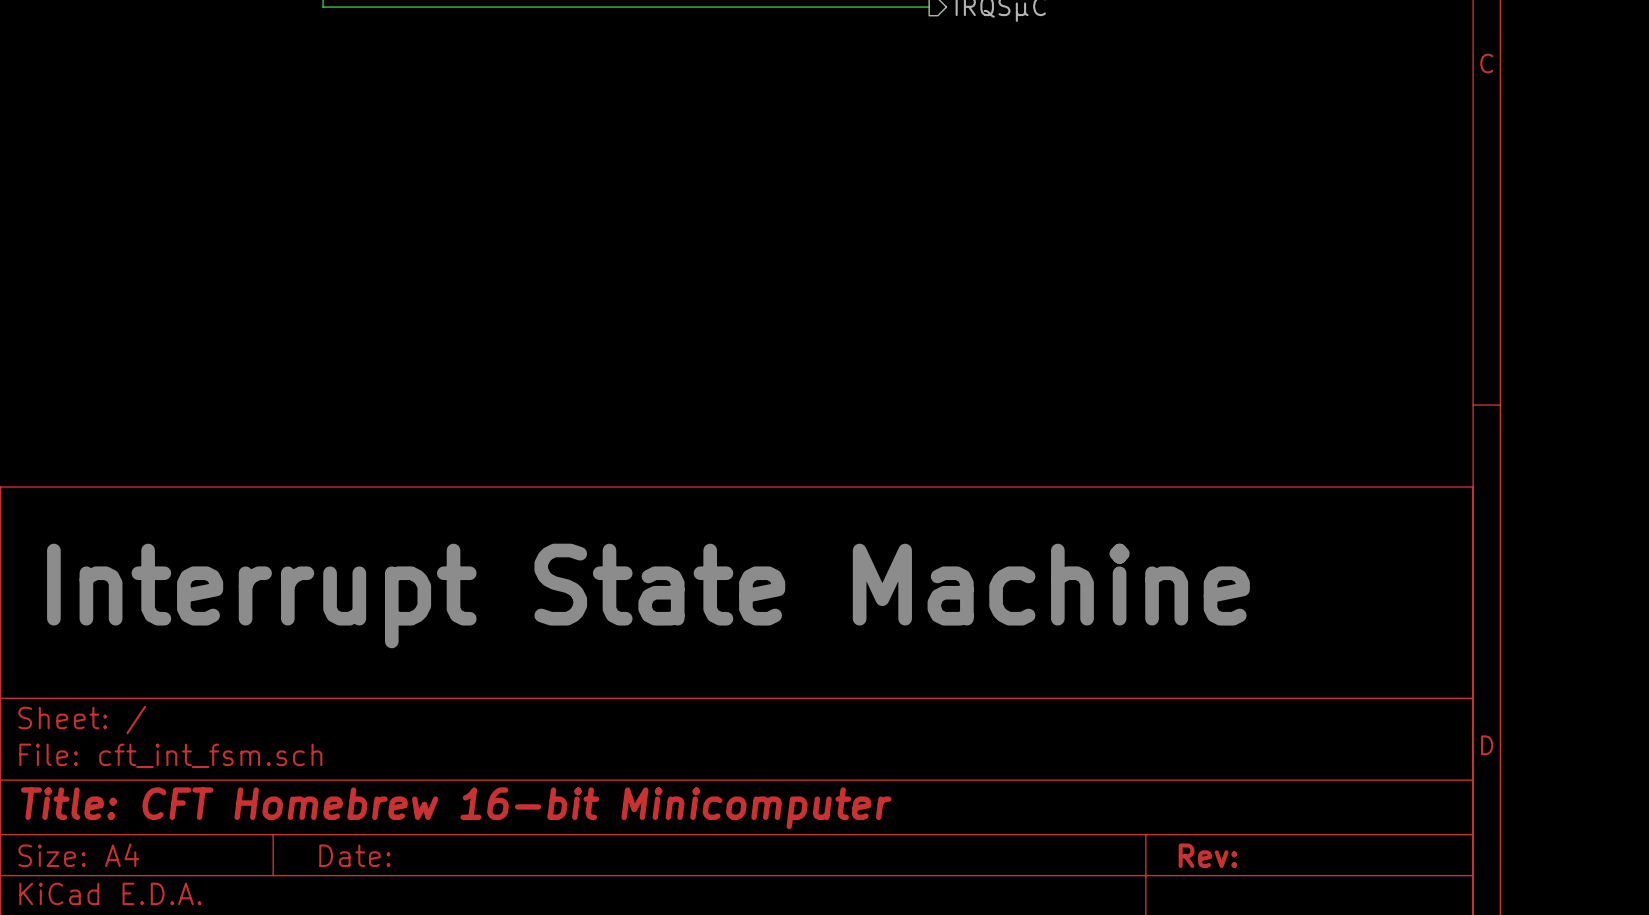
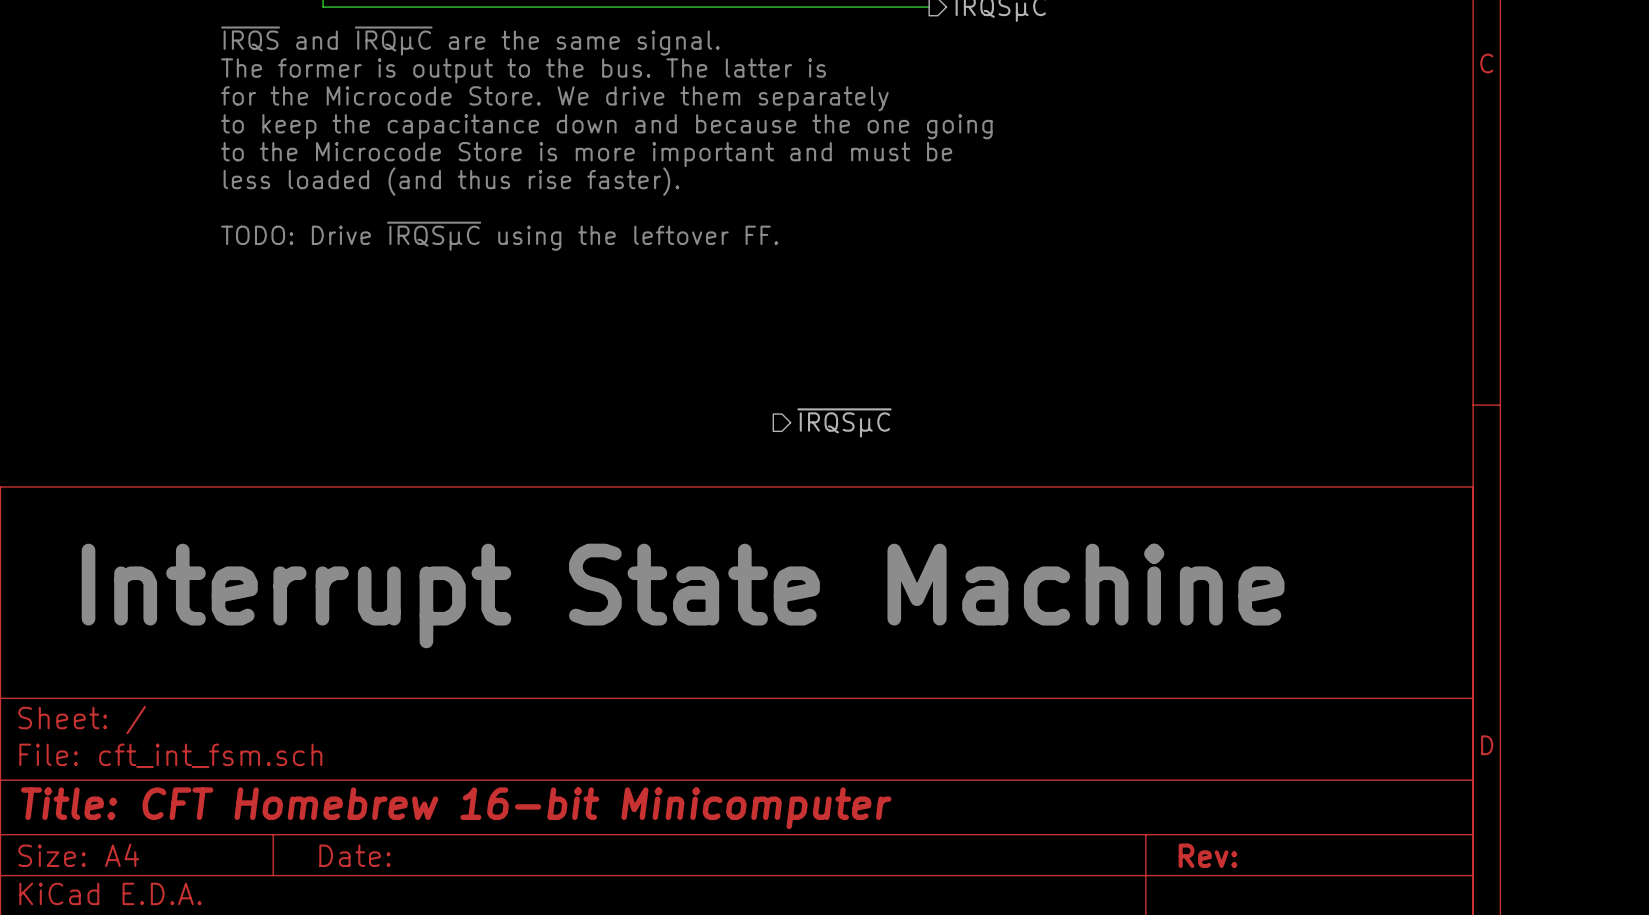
text: none -> ~{IRQS} and ~{IRQµC} are the same signal. (470, 41)
text: none -> The former is output to the bus. The latter is (523, 70)
text: none -> for the Microcode Store. We drive them separately (554, 98)
text: none -> to keep the capacitance down and because the one going (606, 126)
text: none -> to the Microcode Store is more important and must be (586, 154)
text: none -> less loaded (and thus rise faster). (451, 181)
text: none -> TODO: Drive ~{IRQSµC} using the leftover FF. (499, 236)
hierarchical label: none -> ~{IRQSµC} (844, 422)
text position: Interrupt State Machine (648, 595) -> Interrupt State Machine (683, 595)

